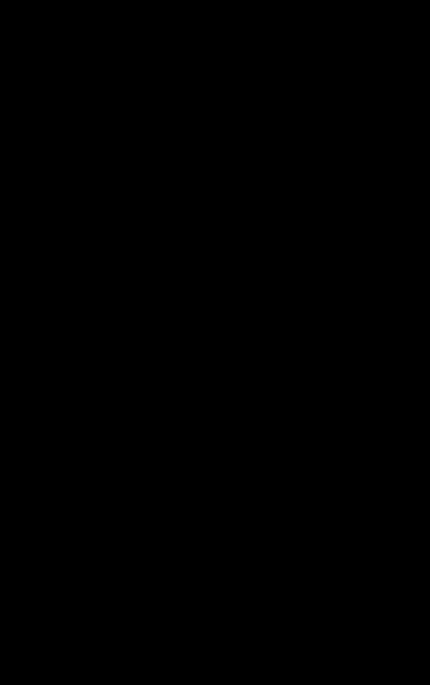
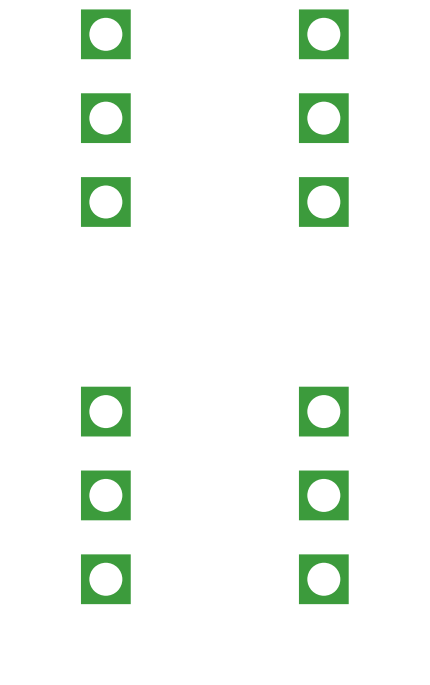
part: none -> (105, 118)
part: none -> (323, 118)
part: none -> (105, 495)
part: none -> (323, 495)

